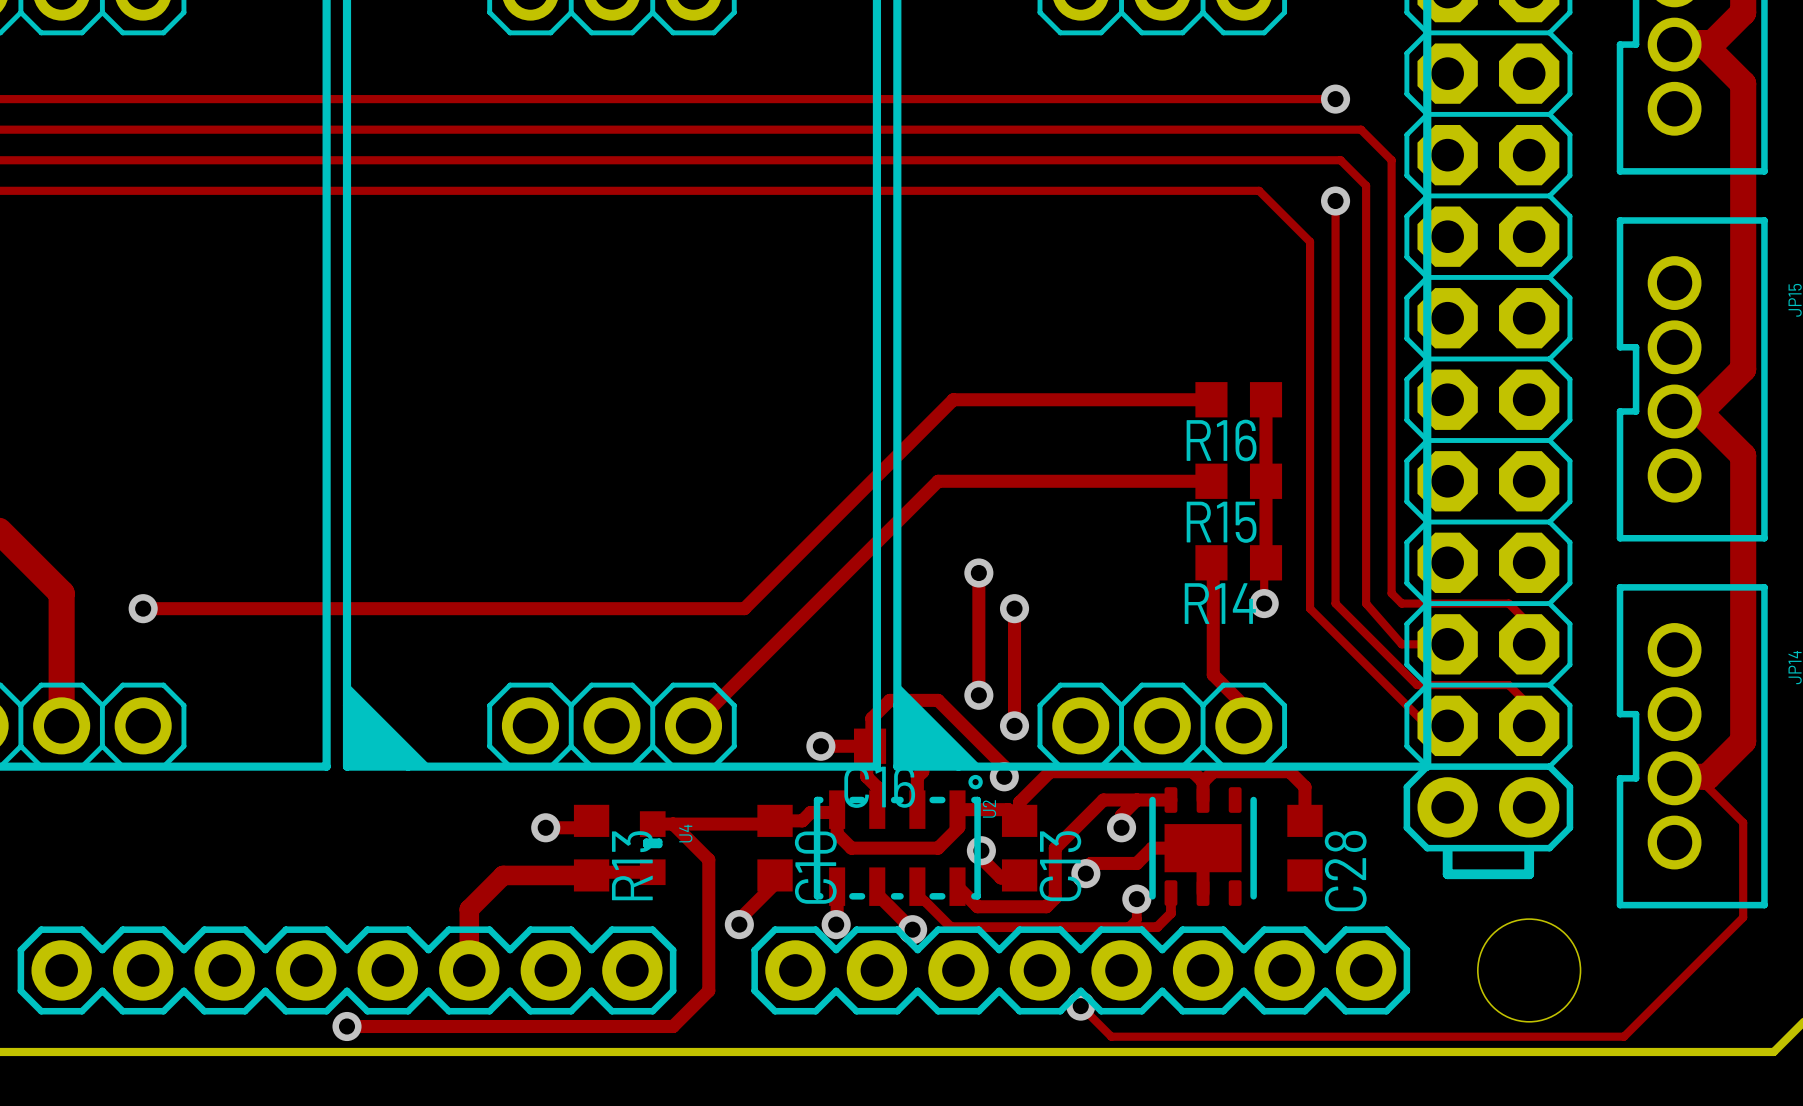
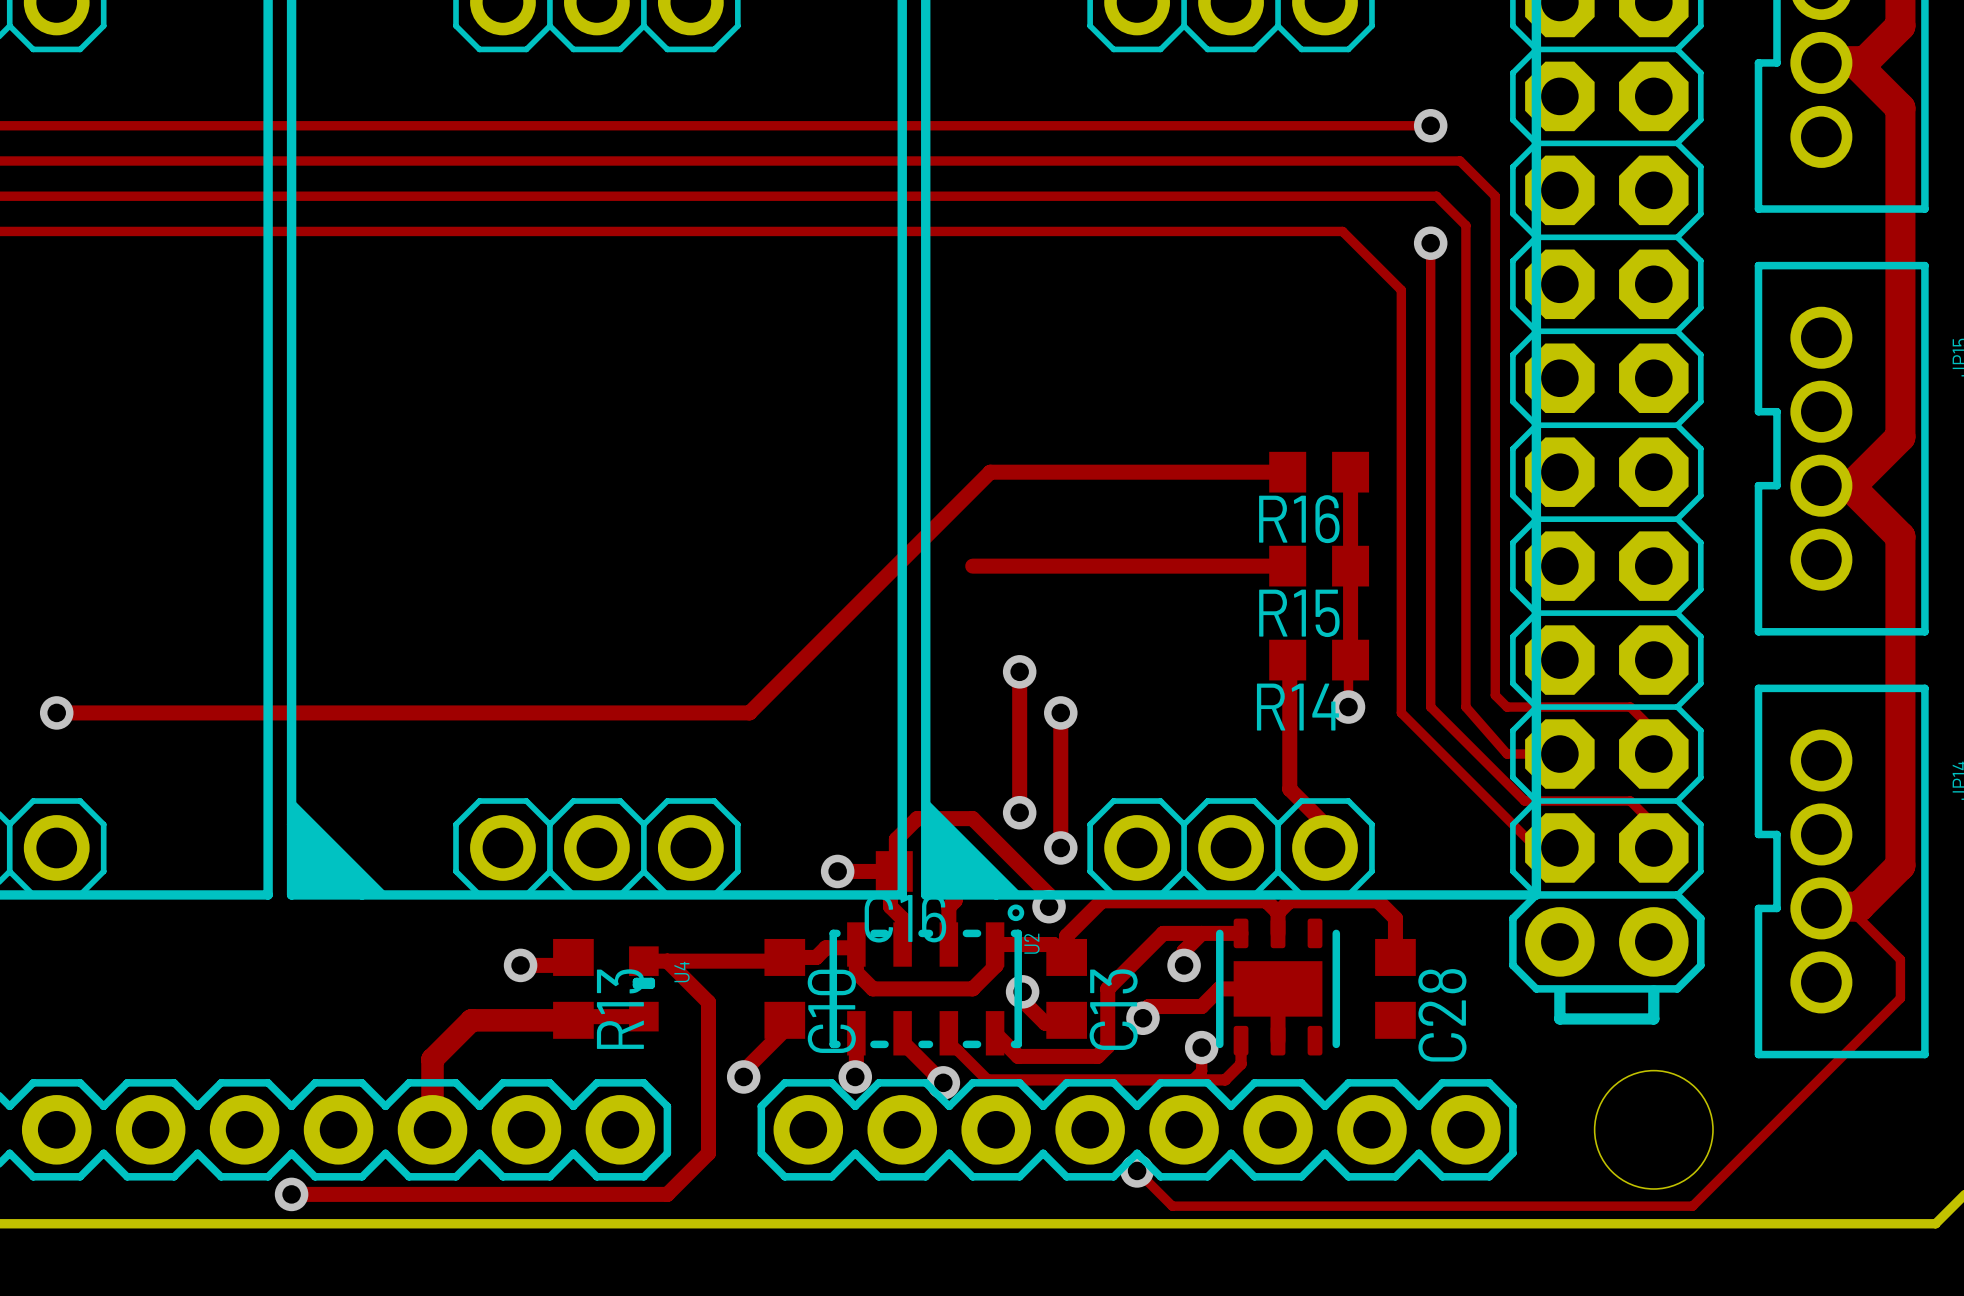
track: (938, 481) (693, 725) -> none
track: (1743, 856) (1743, 917) (1624, 1036) (1562, 1036) -> (1900, 998) (1692, 1206)

